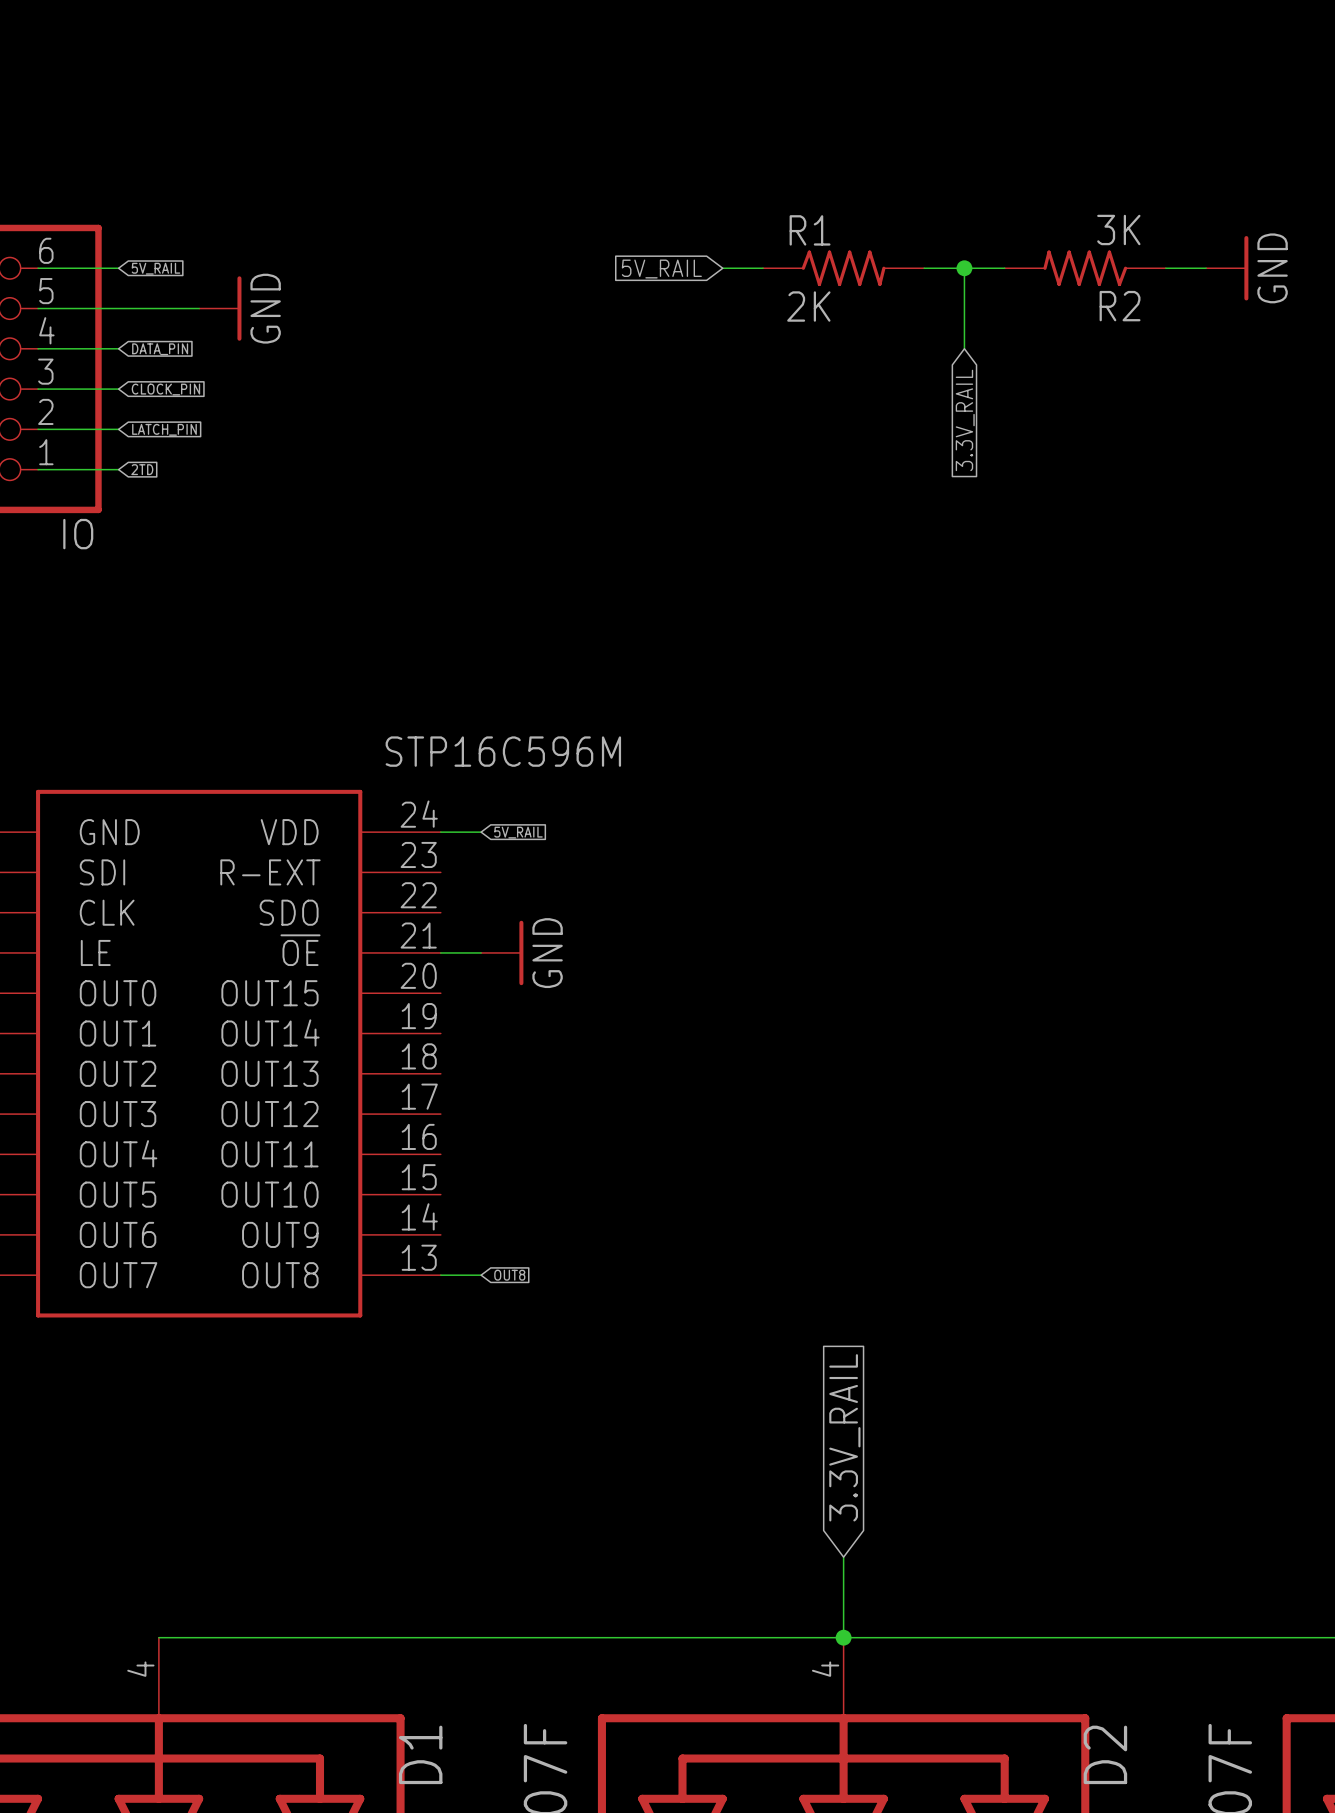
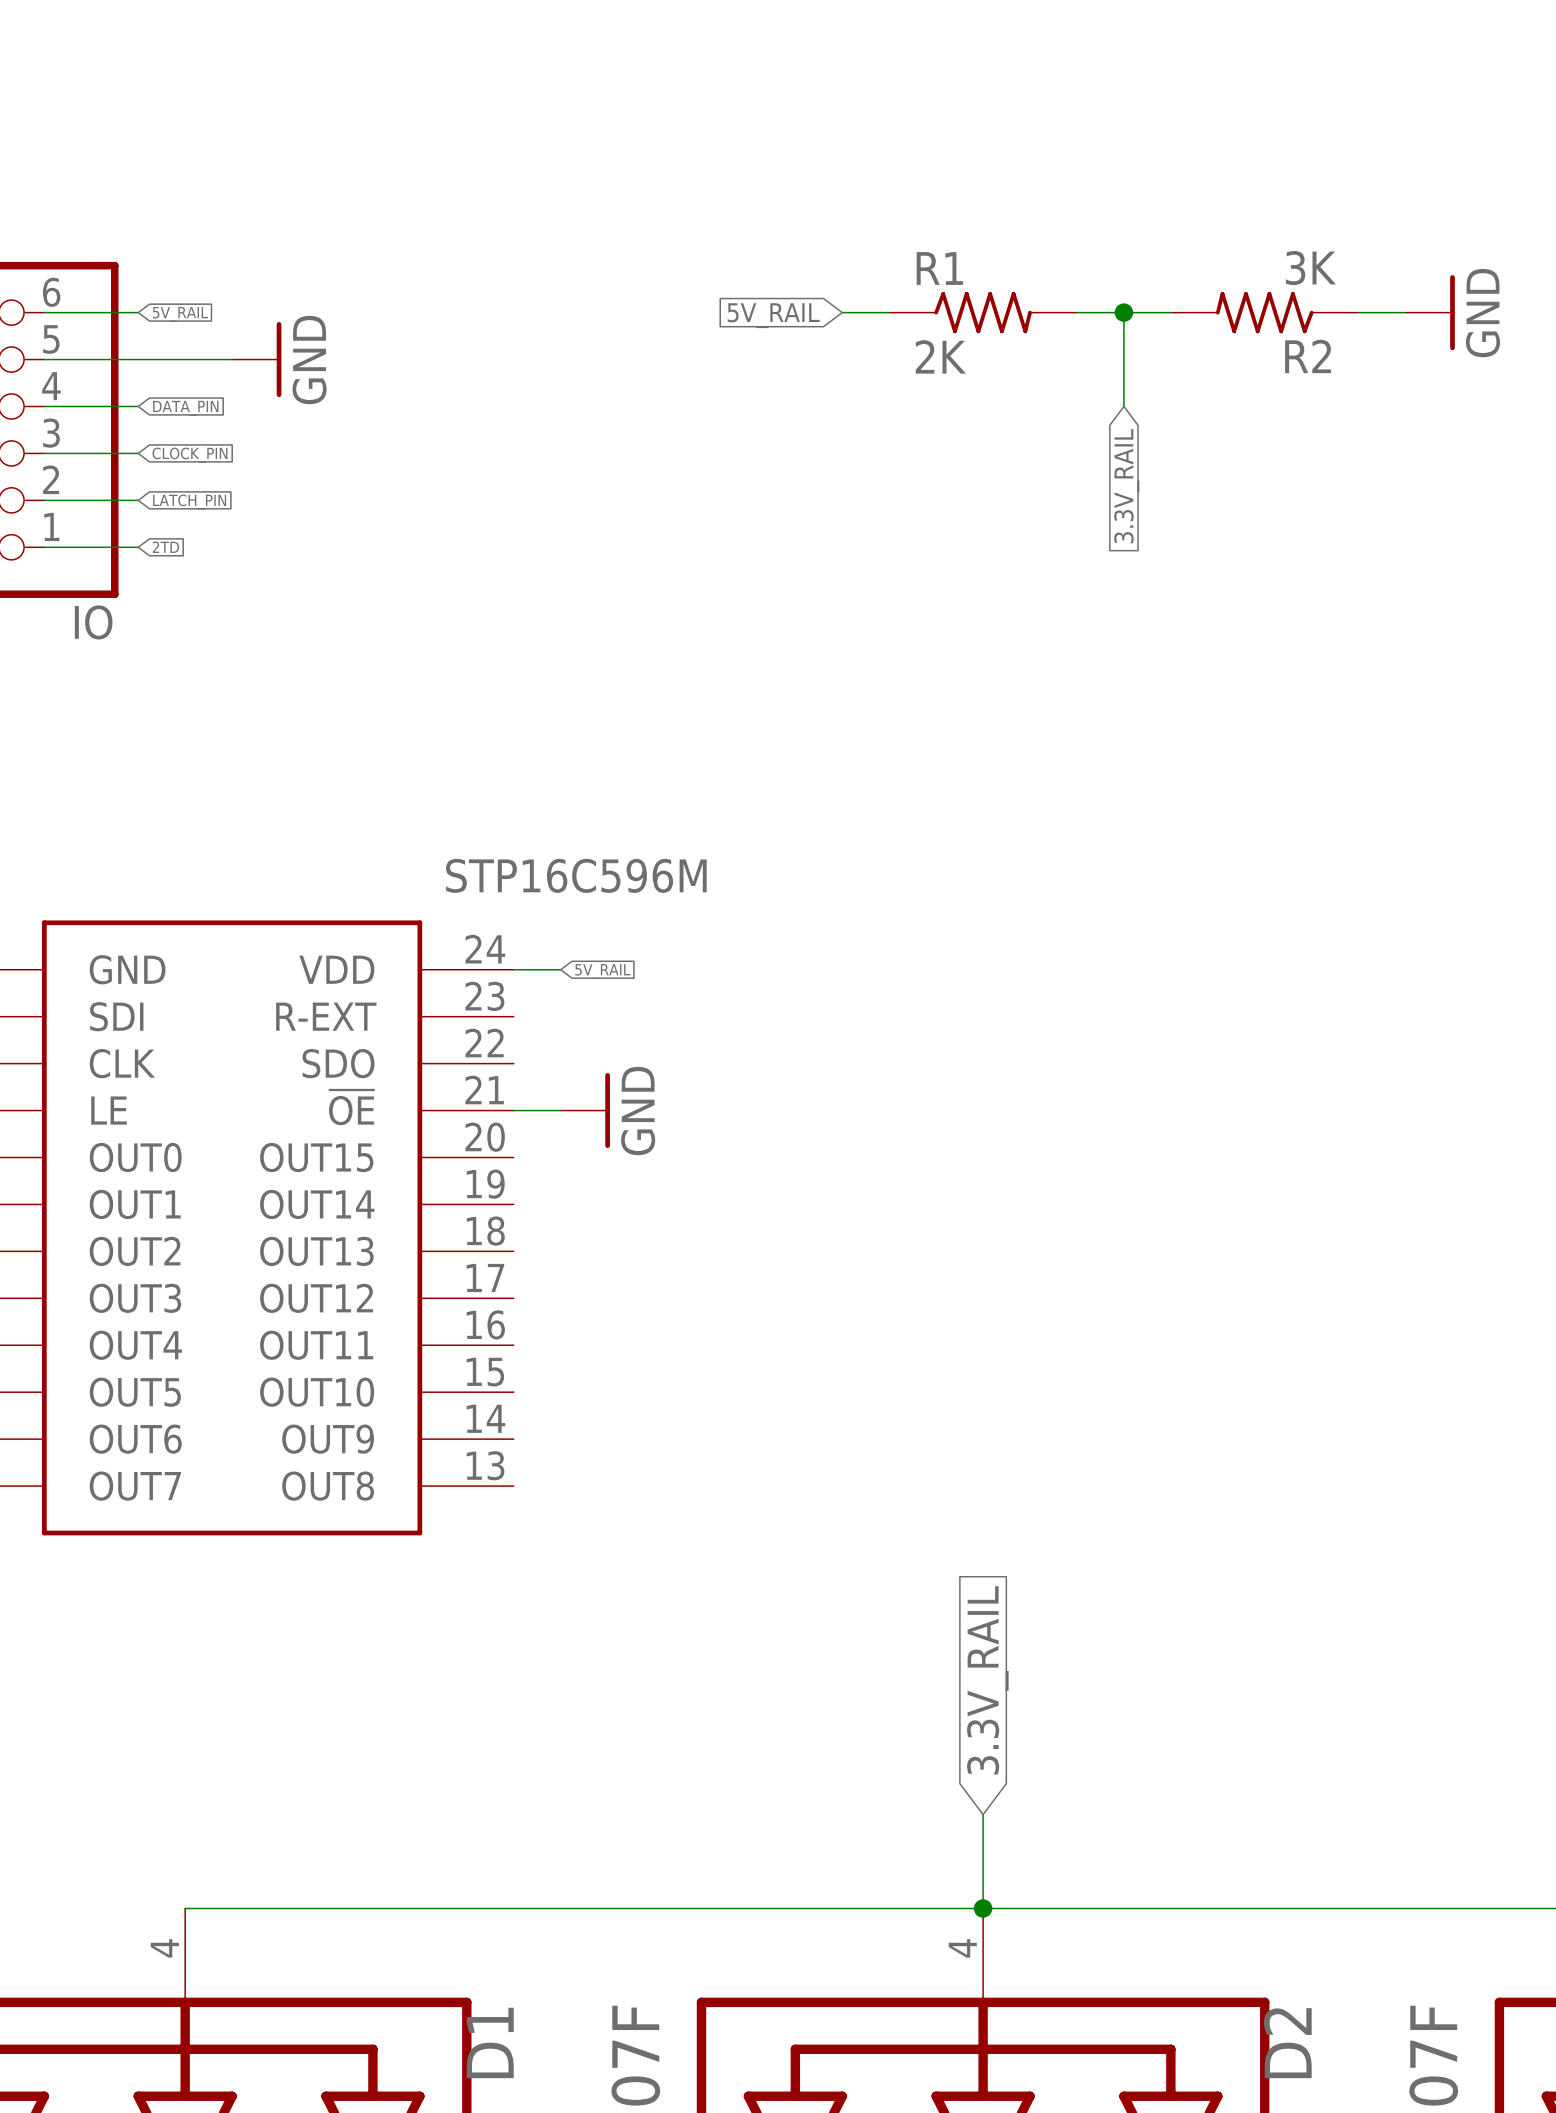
wire: (440, 1275) (481, 1275) -> none
global label: OUT8 (509, 1275) -> none

